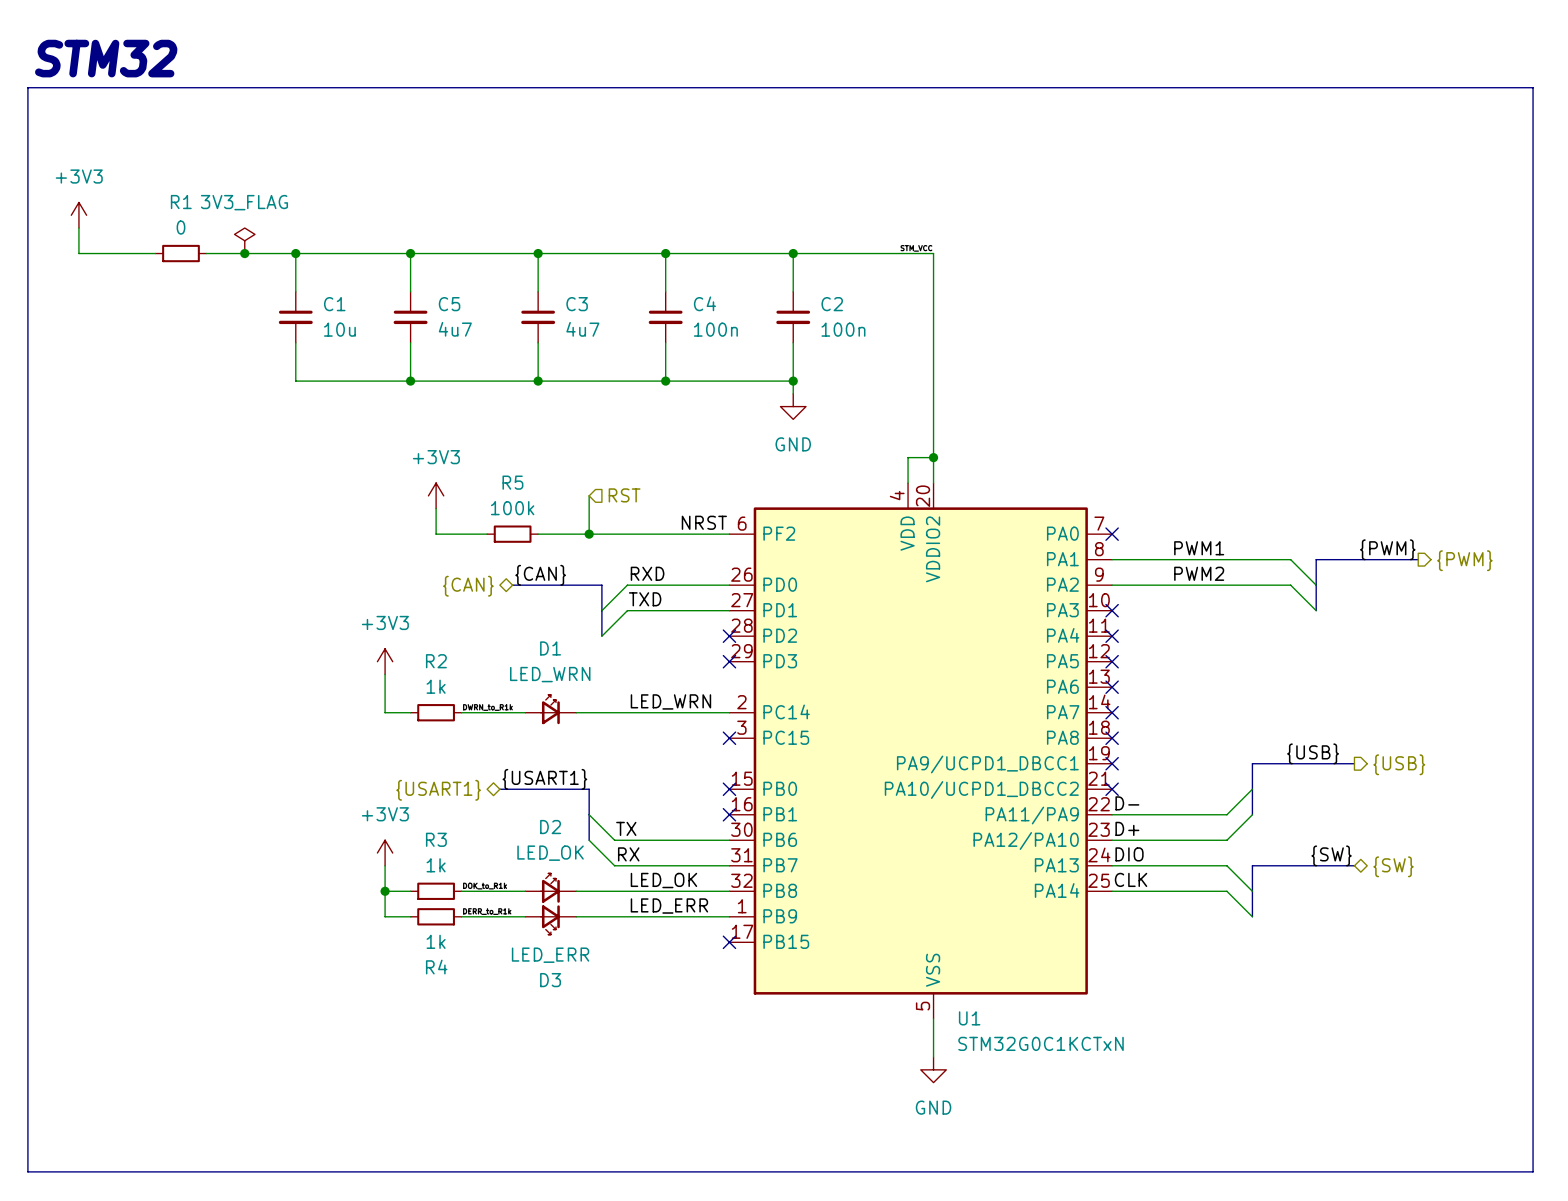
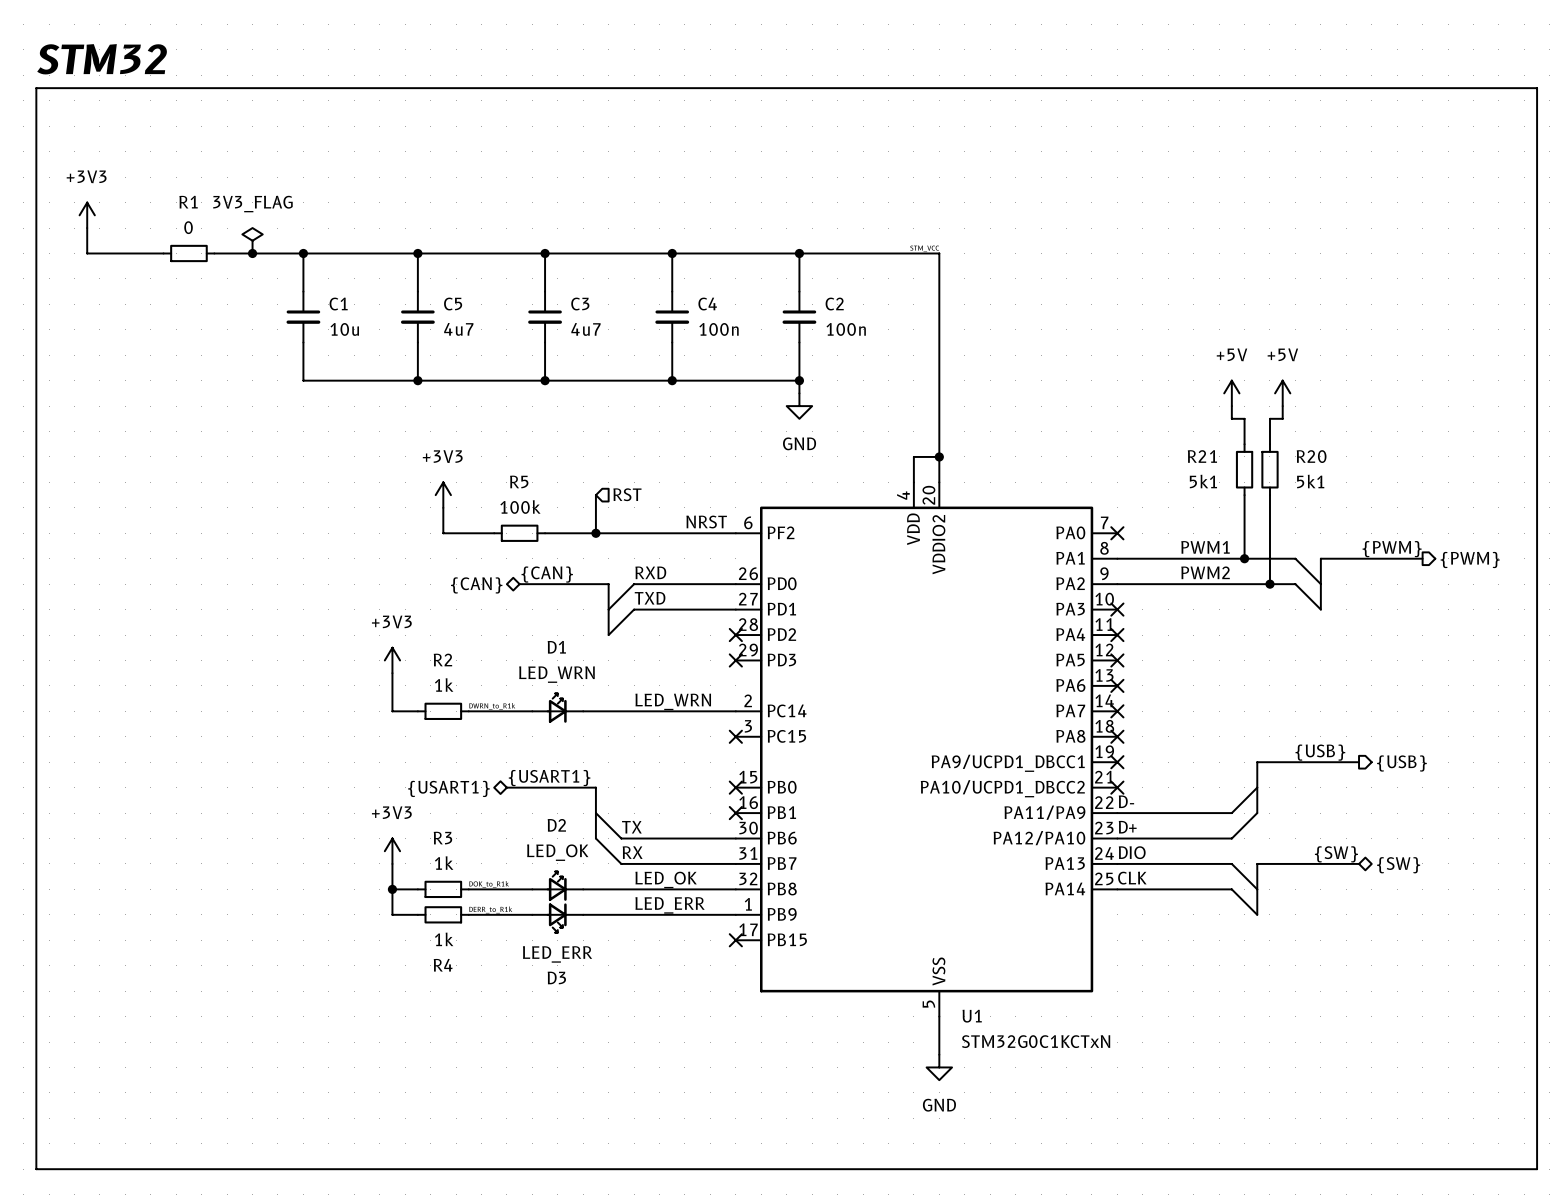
power symbol: none -> +5V (1231, 393)
power symbol: none -> +5V (1282, 393)
wire: none -> (1231, 406) (1231, 418) (1244, 418) (1244, 444)
wire: none -> (1282, 406) (1282, 418) (1269, 418) (1269, 444)
R21: none -> 5k1 (1244, 469)
R20: none -> 5k1 (1269, 469)
wire: none -> (1244, 495) (1244, 558)
wire: none -> (1269, 495) (1269, 584)
junction: none -> (1244, 558)
junction: none -> (1269, 584)

